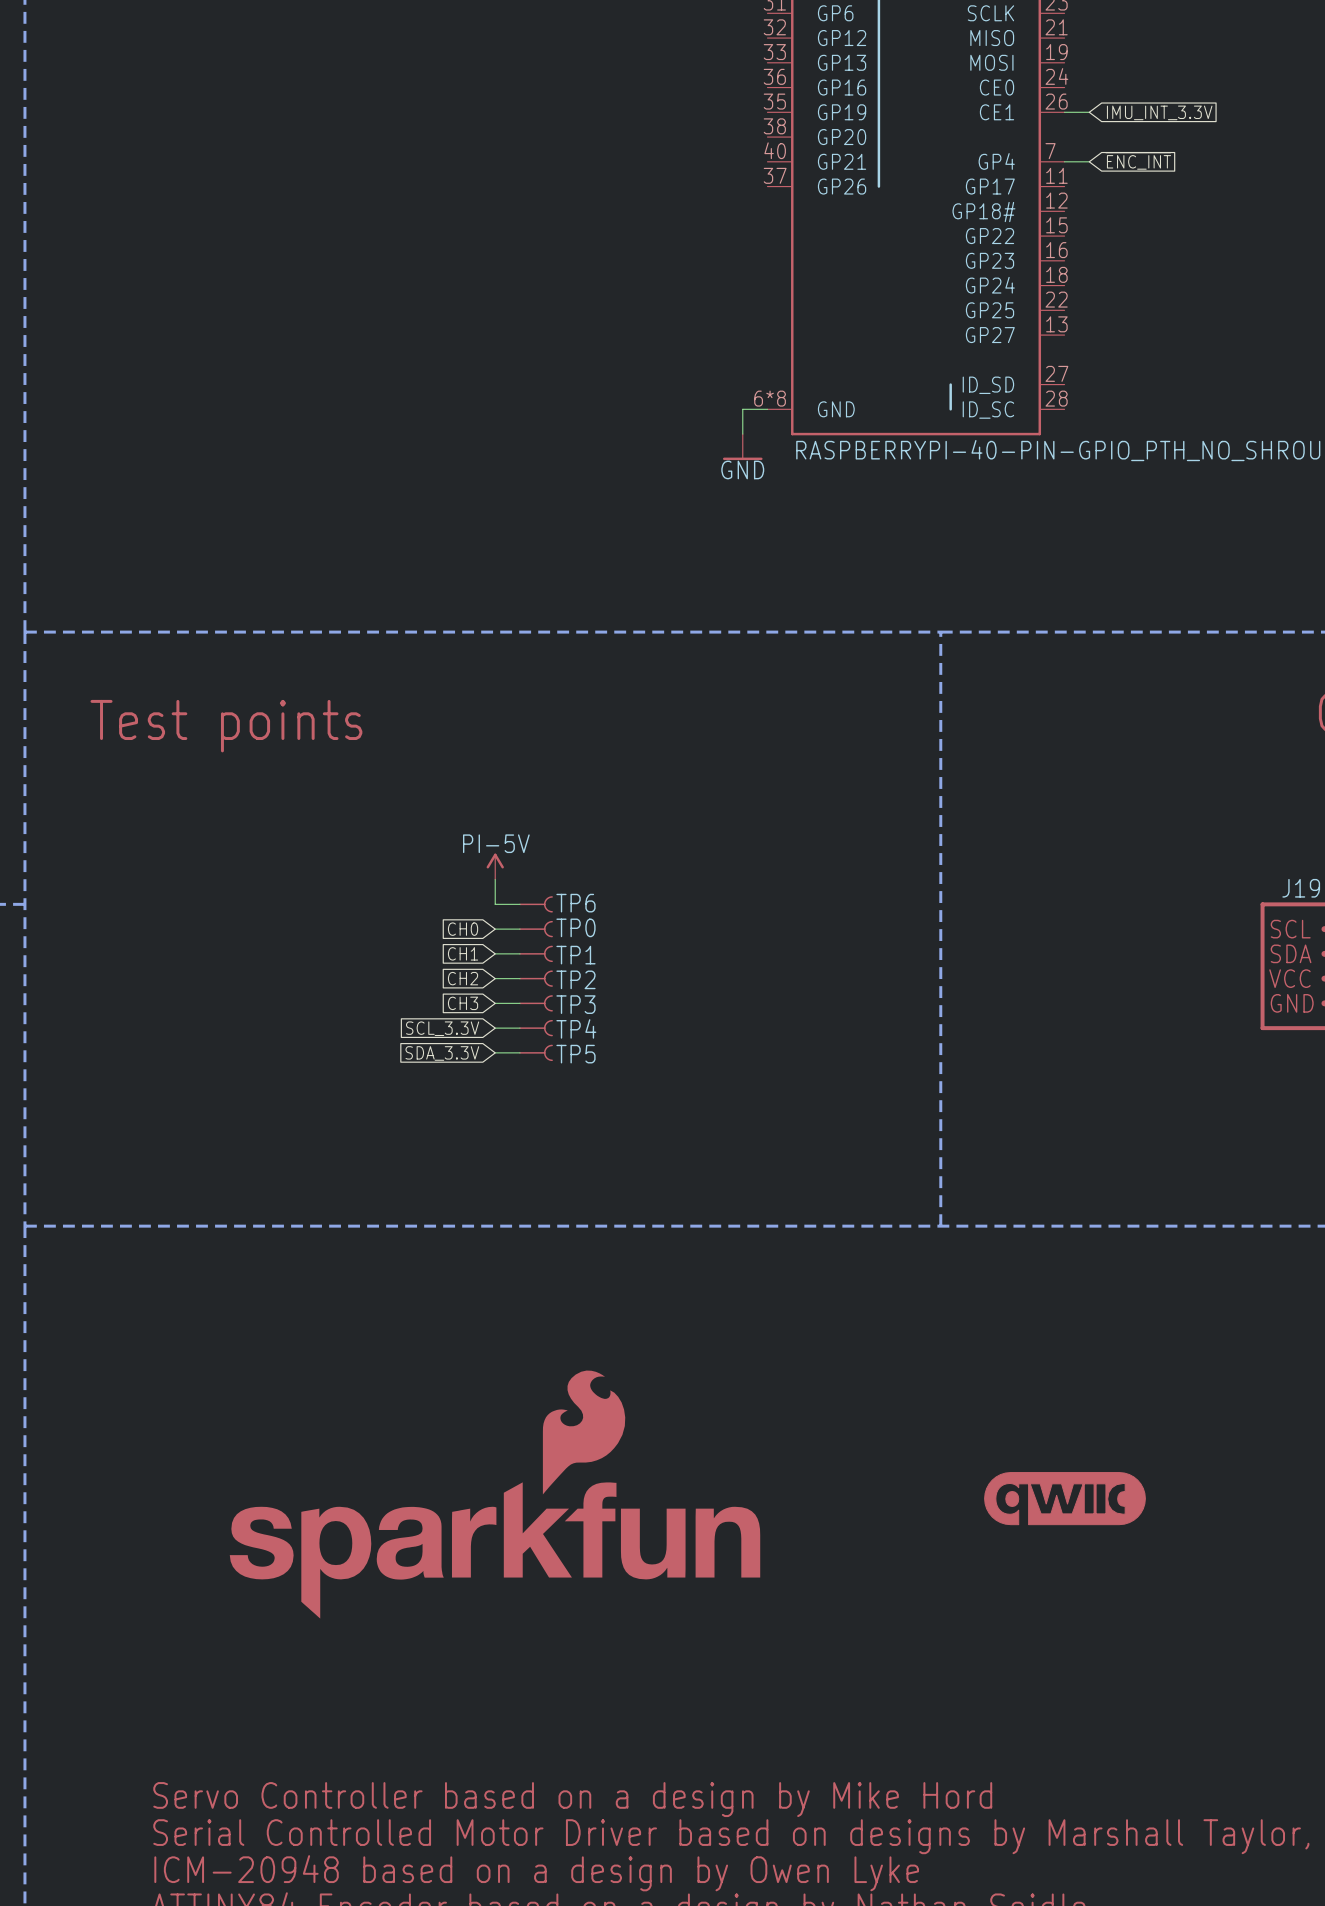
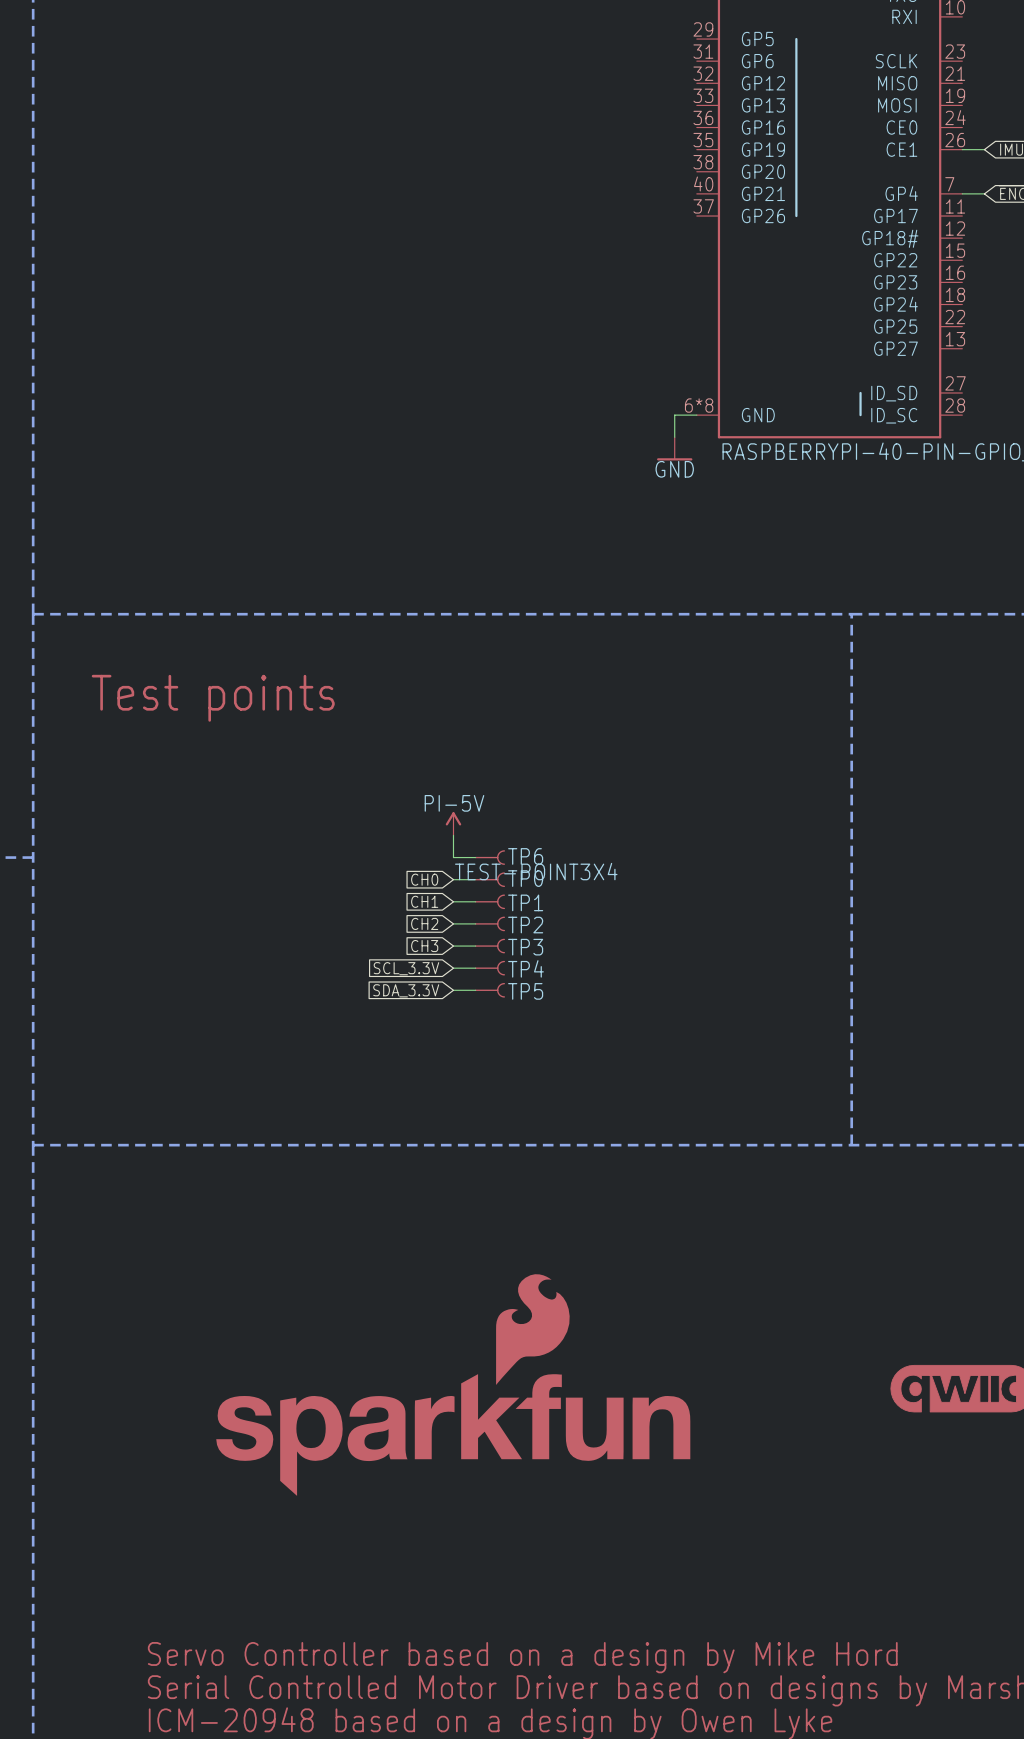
TP6 value: none -> TEST-POINT3X4 (536, 871)

